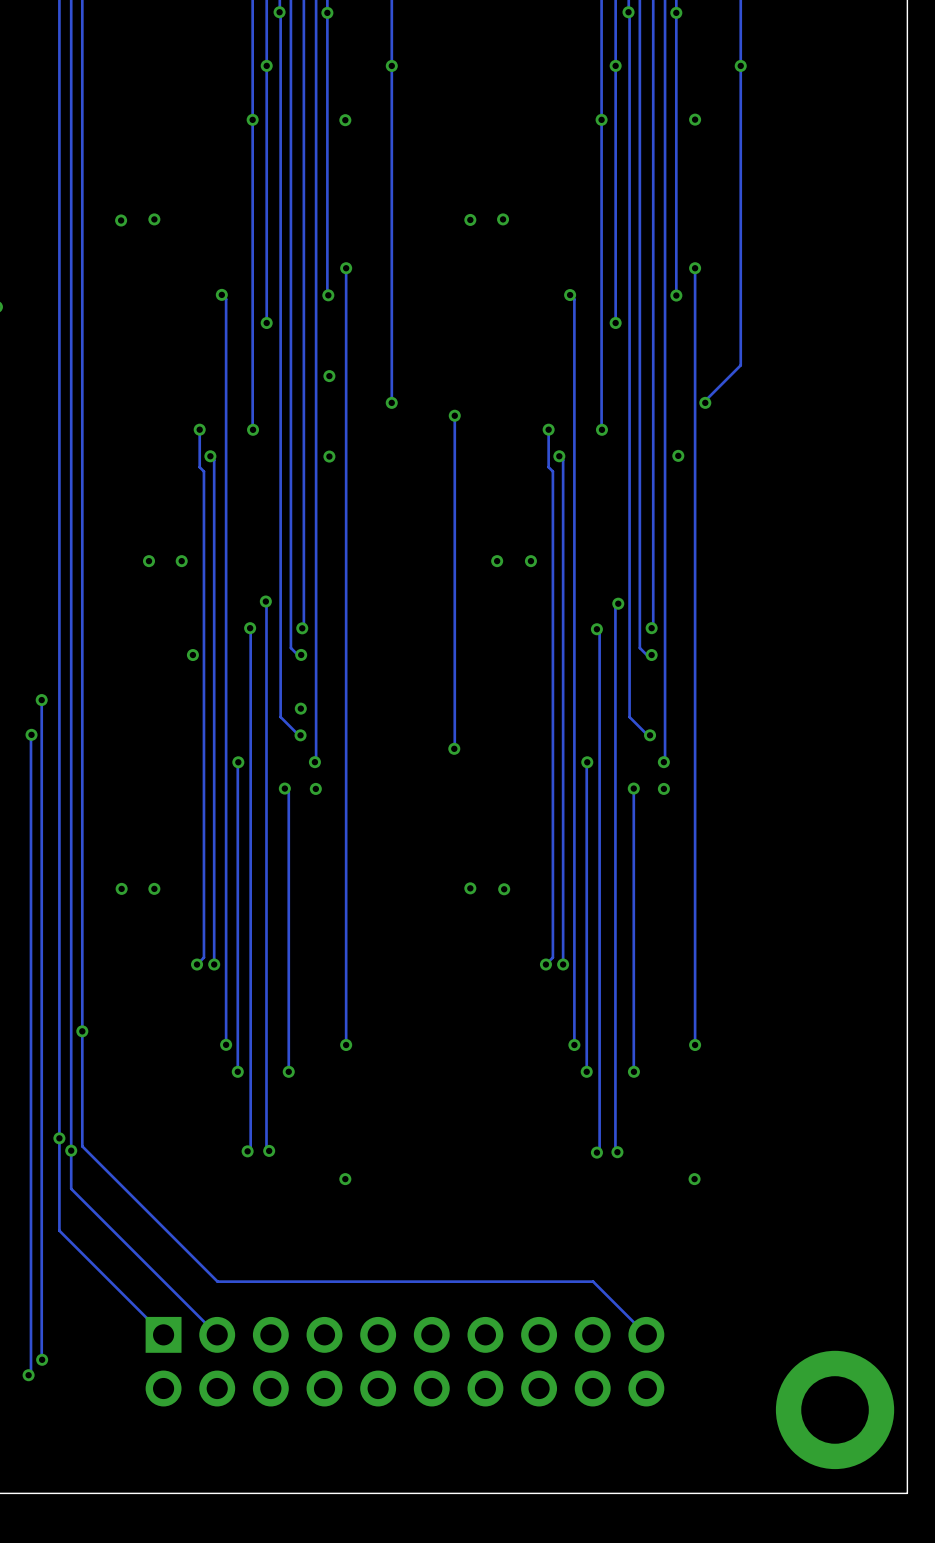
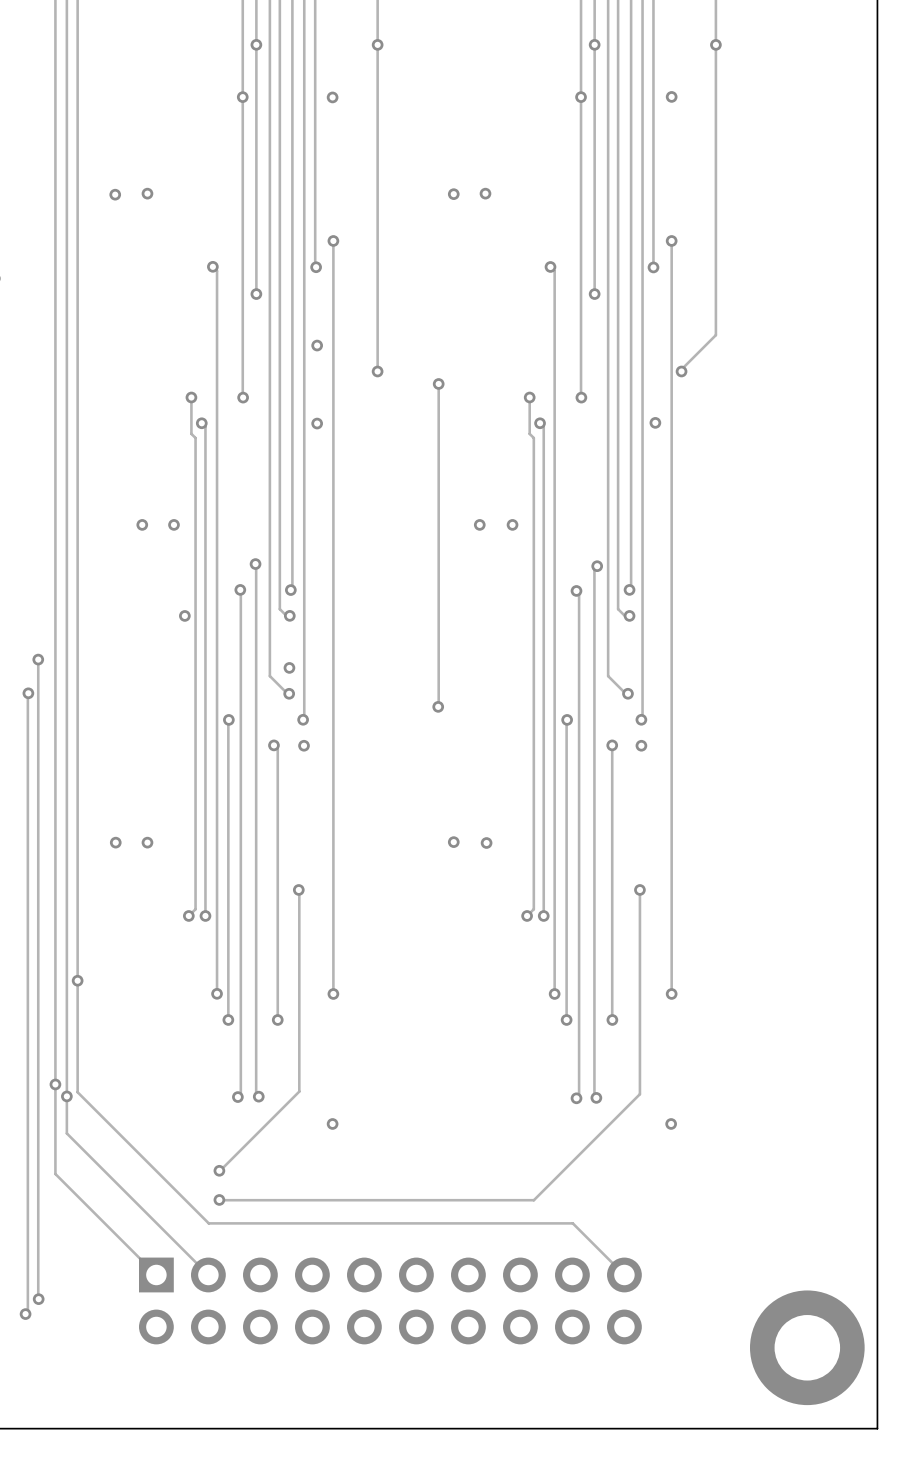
track: none -> (298, 889) (299, 1091) (219, 1170)
via: none -> (298, 889)
track: none -> (639, 889) (639, 1094) (533, 1200) (219, 1200)
via: none -> (639, 889)
via: none -> (219, 1170)
via: none -> (219, 1199)

